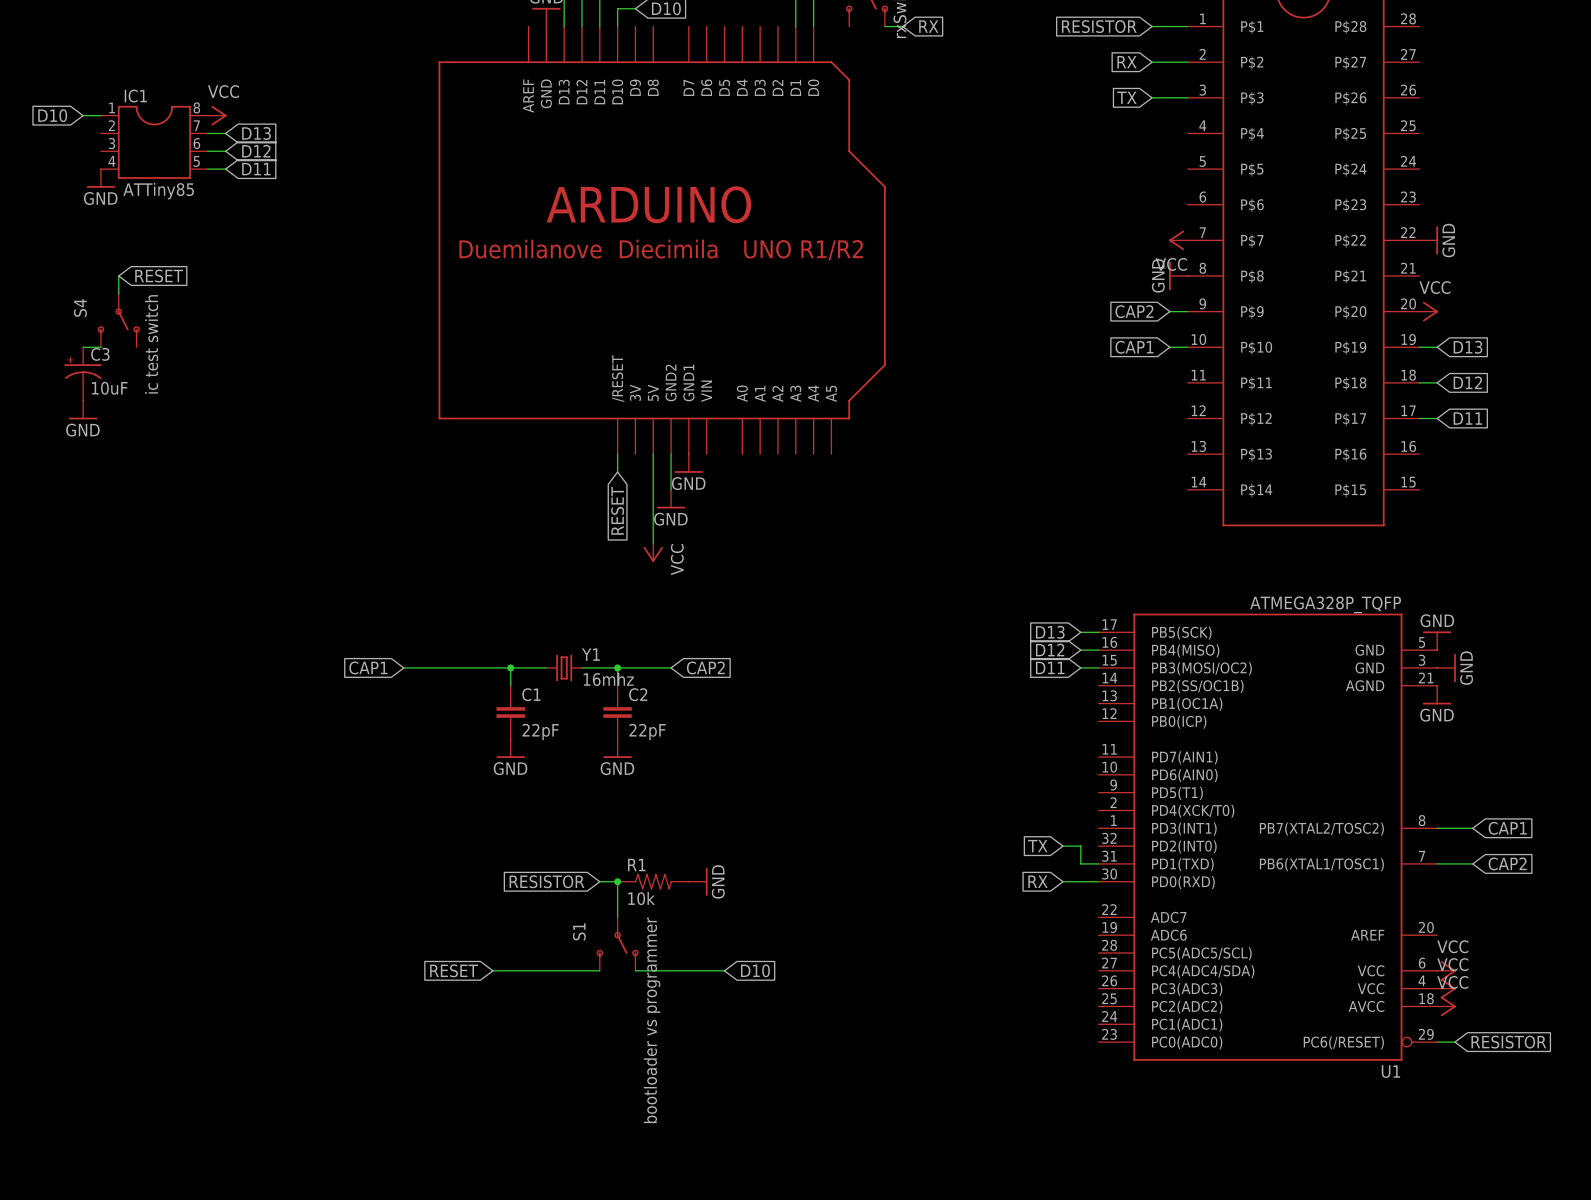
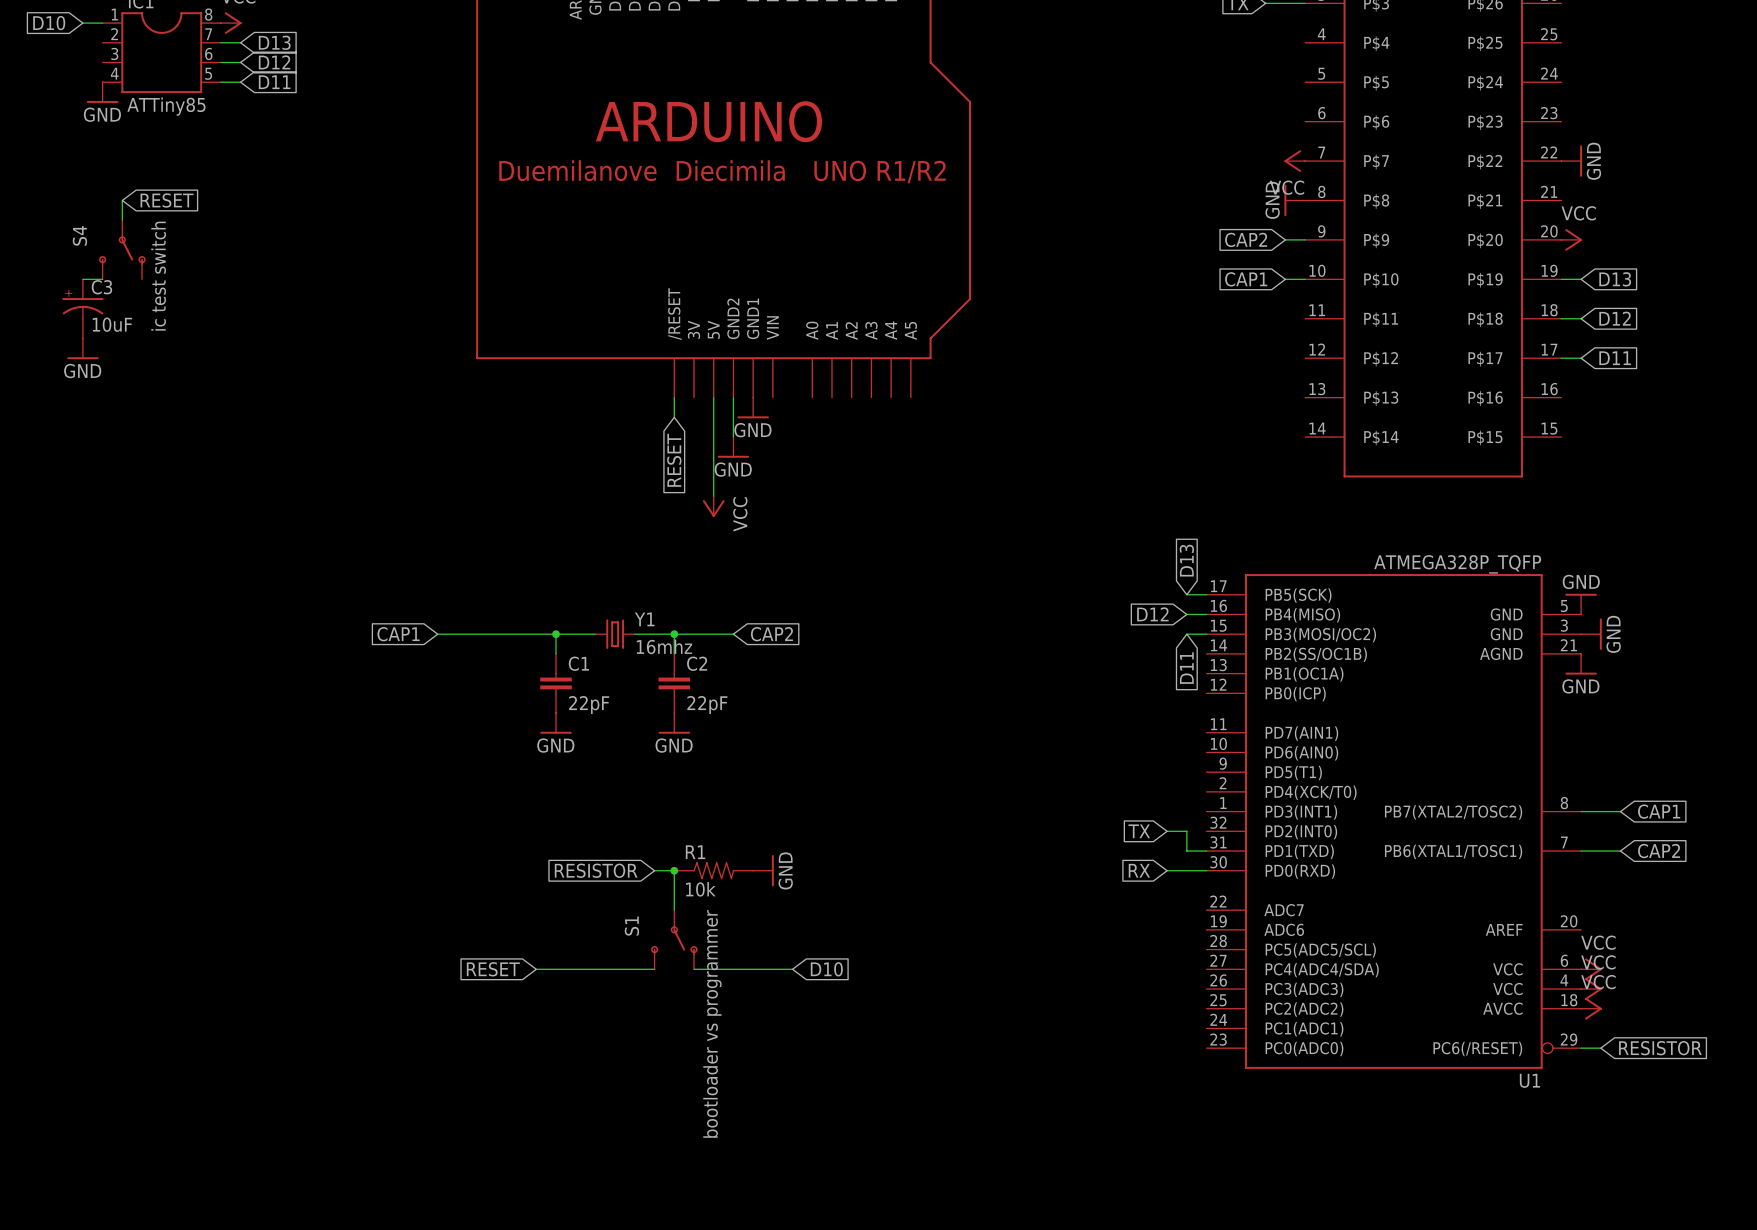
global label rotation: 0° (1050, 632) -> 90° clockwise (1186, 560)
global label rotation: 0° (1050, 667) -> 90° counterclockwise (1186, 668)

